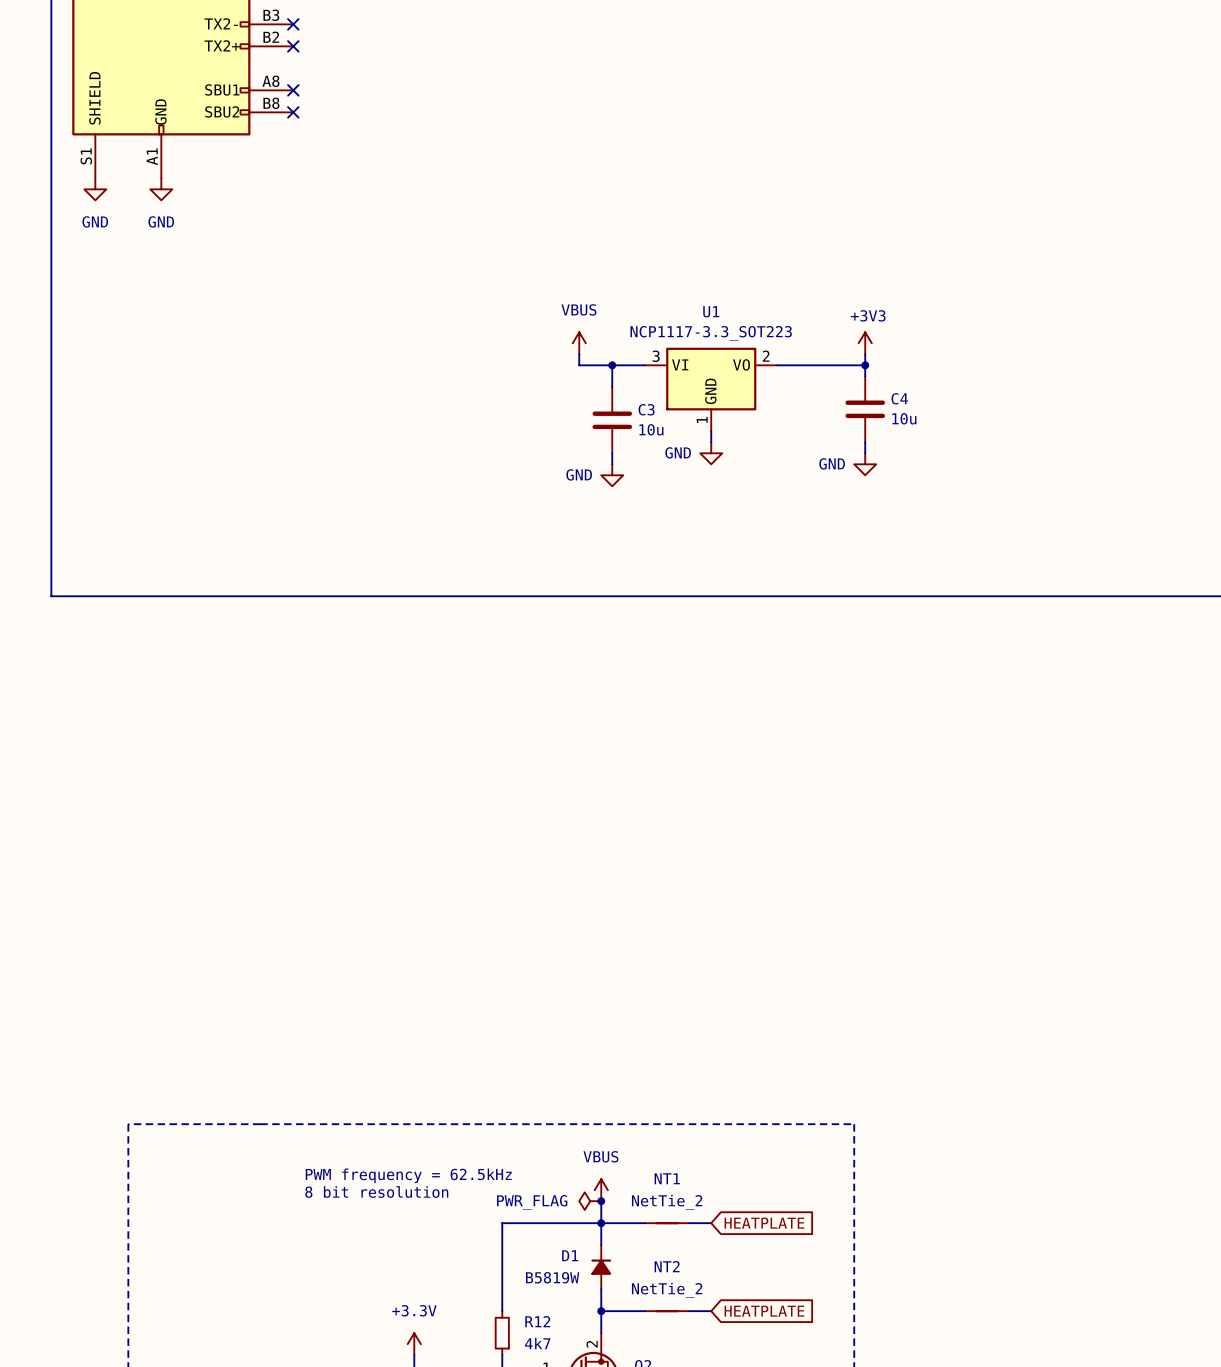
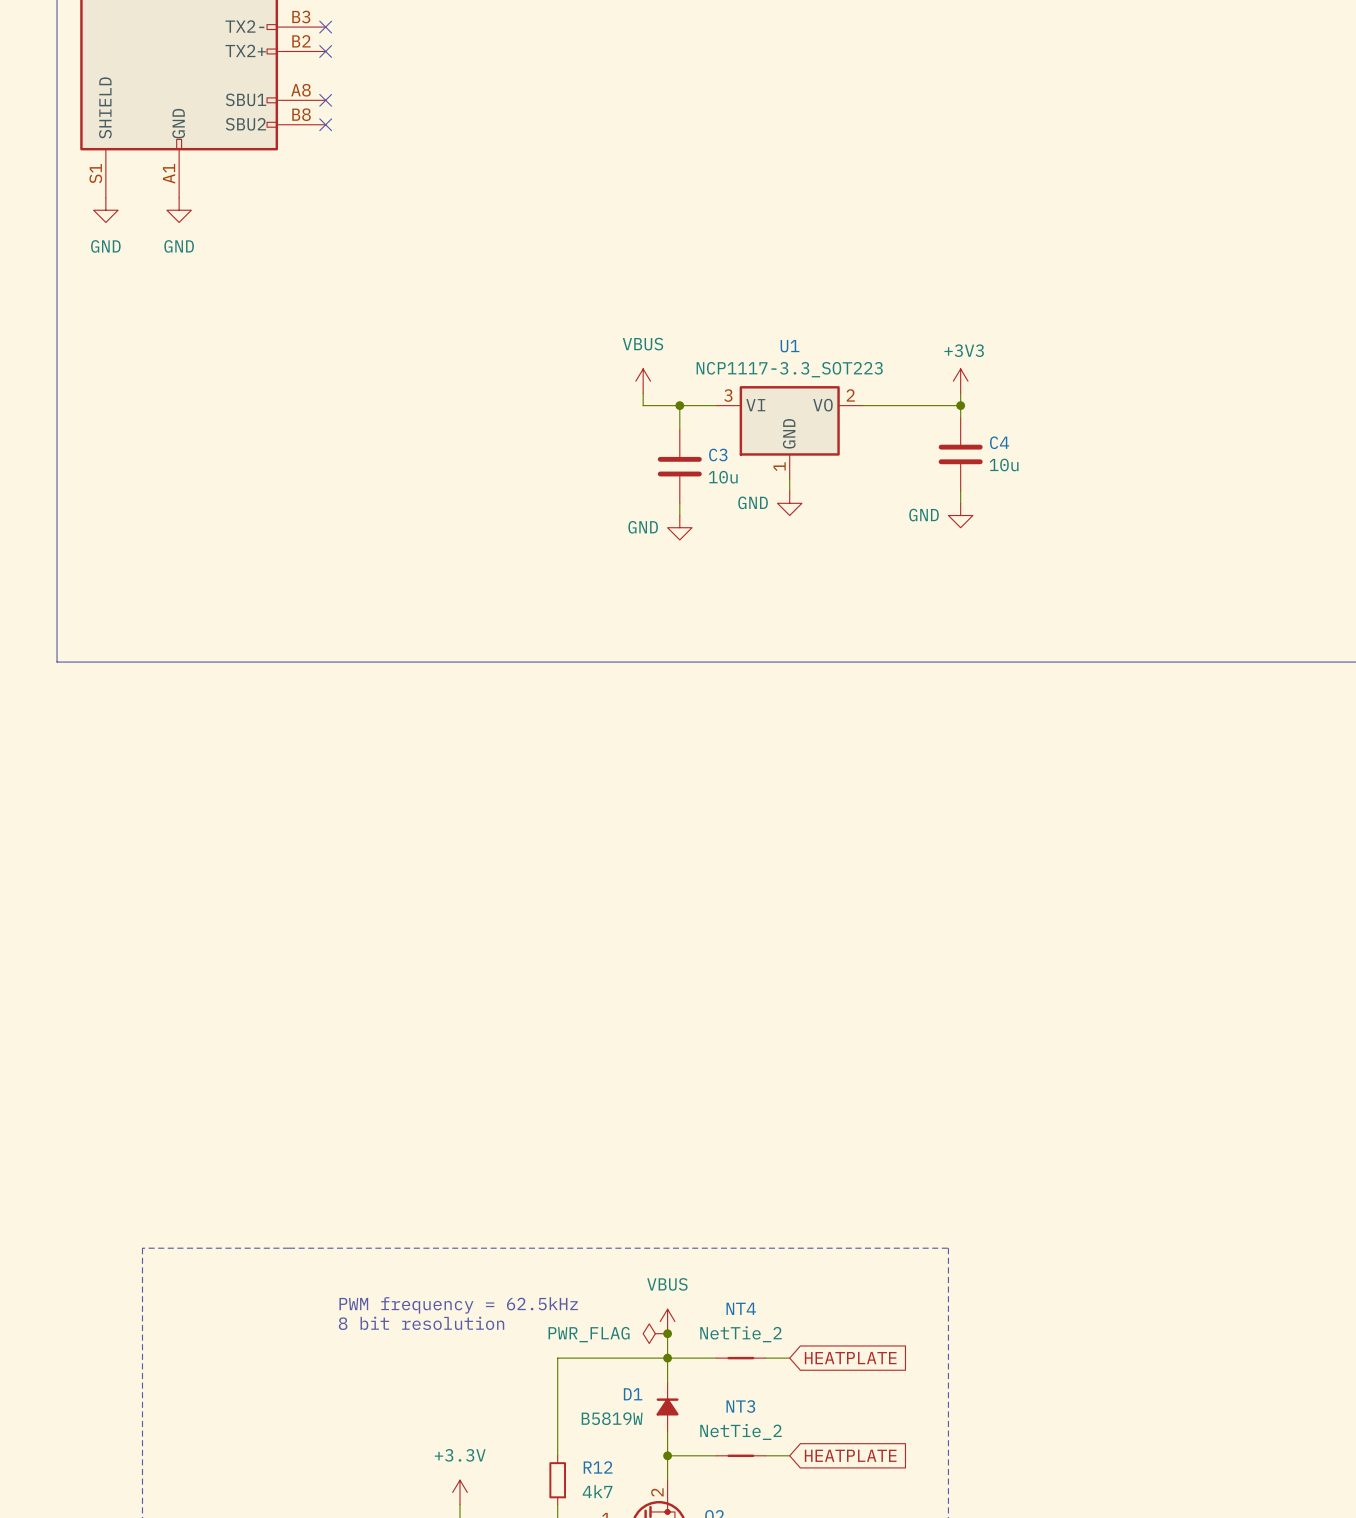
NT1 name: NT1 (667, 1178) -> NT4 (741, 1308)
NT2 name: NT2 (667, 1266) -> NT3 (740, 1406)

